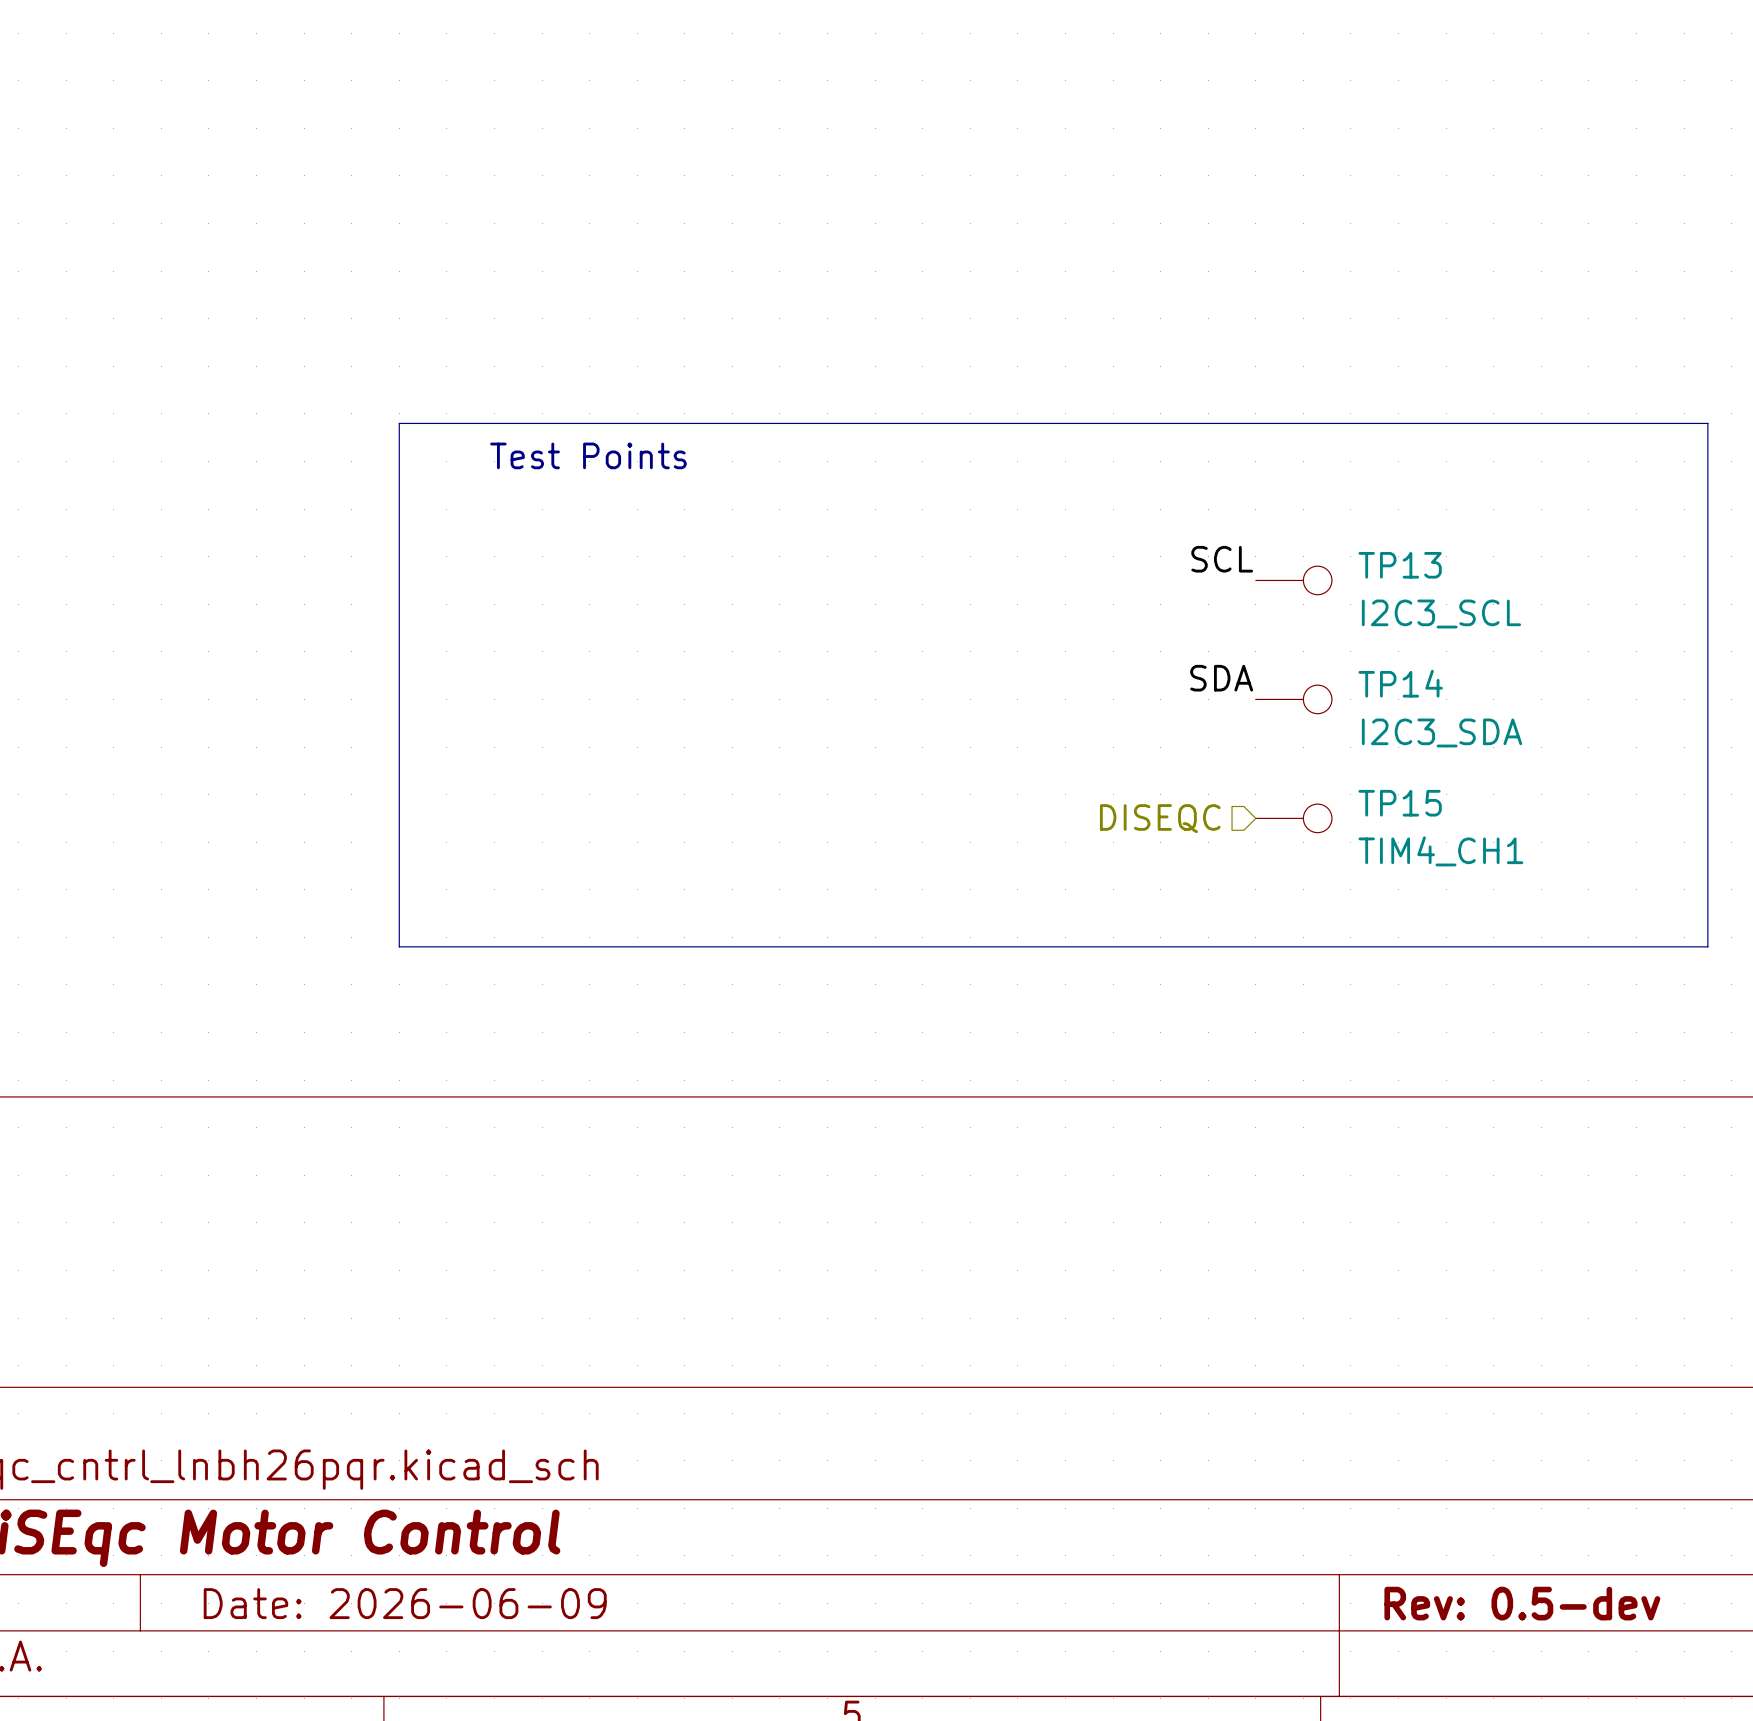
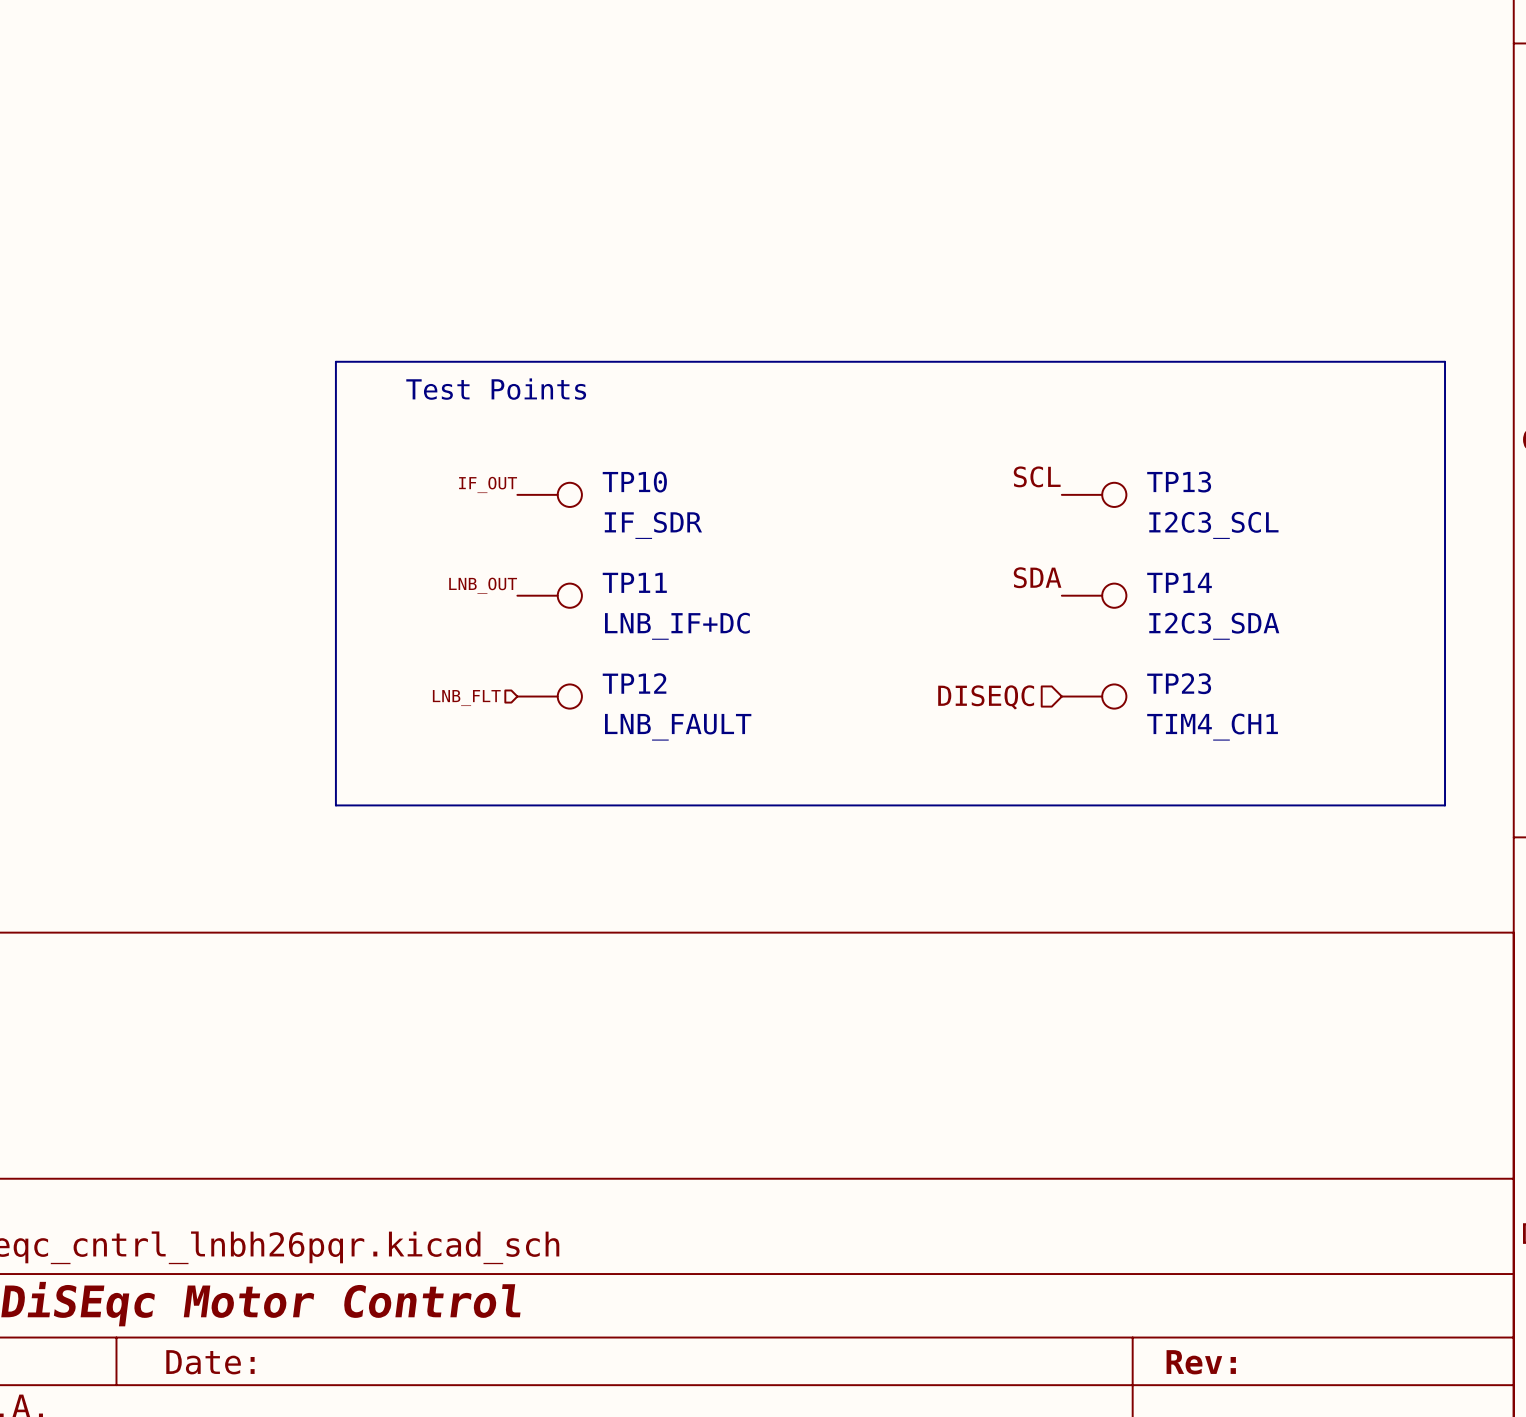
label: none -> IF_OUT (488, 484)
TP10: none -> IF_SDR (549, 494)
label: none -> LNB_OUT (483, 585)
TP11: none -> LNB_IF+DC (549, 595)
TP15 name: TP15 (1400, 803) -> TP23 (1179, 683)
hierarchical label: none -> LNB_FLT (466, 698)
TP12: none -> LNB_FAULT (549, 696)
title block: Date: 2026-06-09 (405, 1603) -> Date: (210, 1362)
title block: Rev: 0.5-dev (1522, 1603) -> Rev: (1201, 1362)

